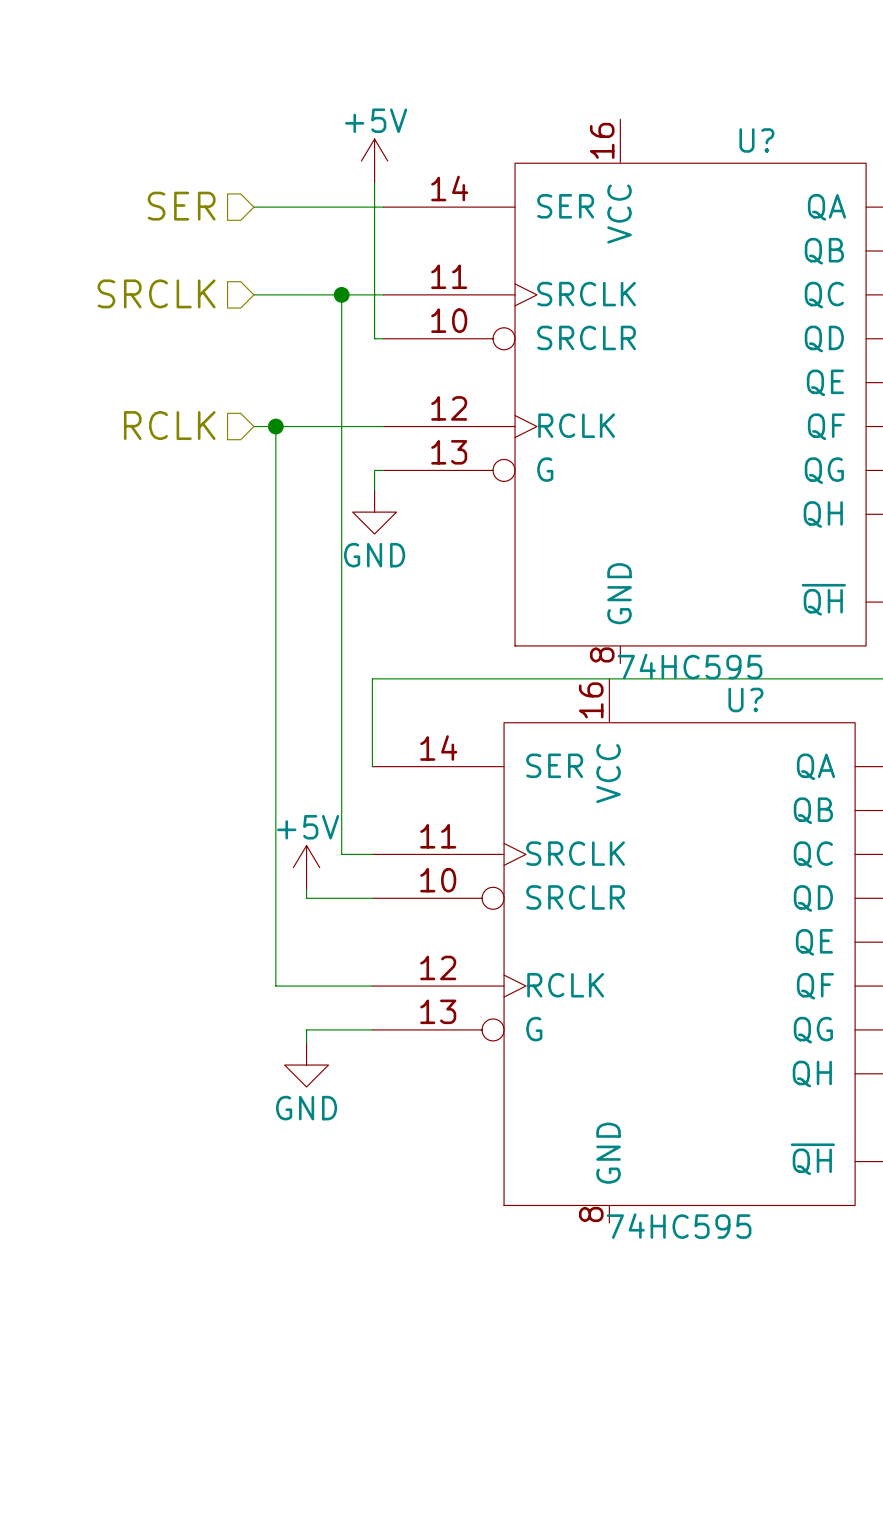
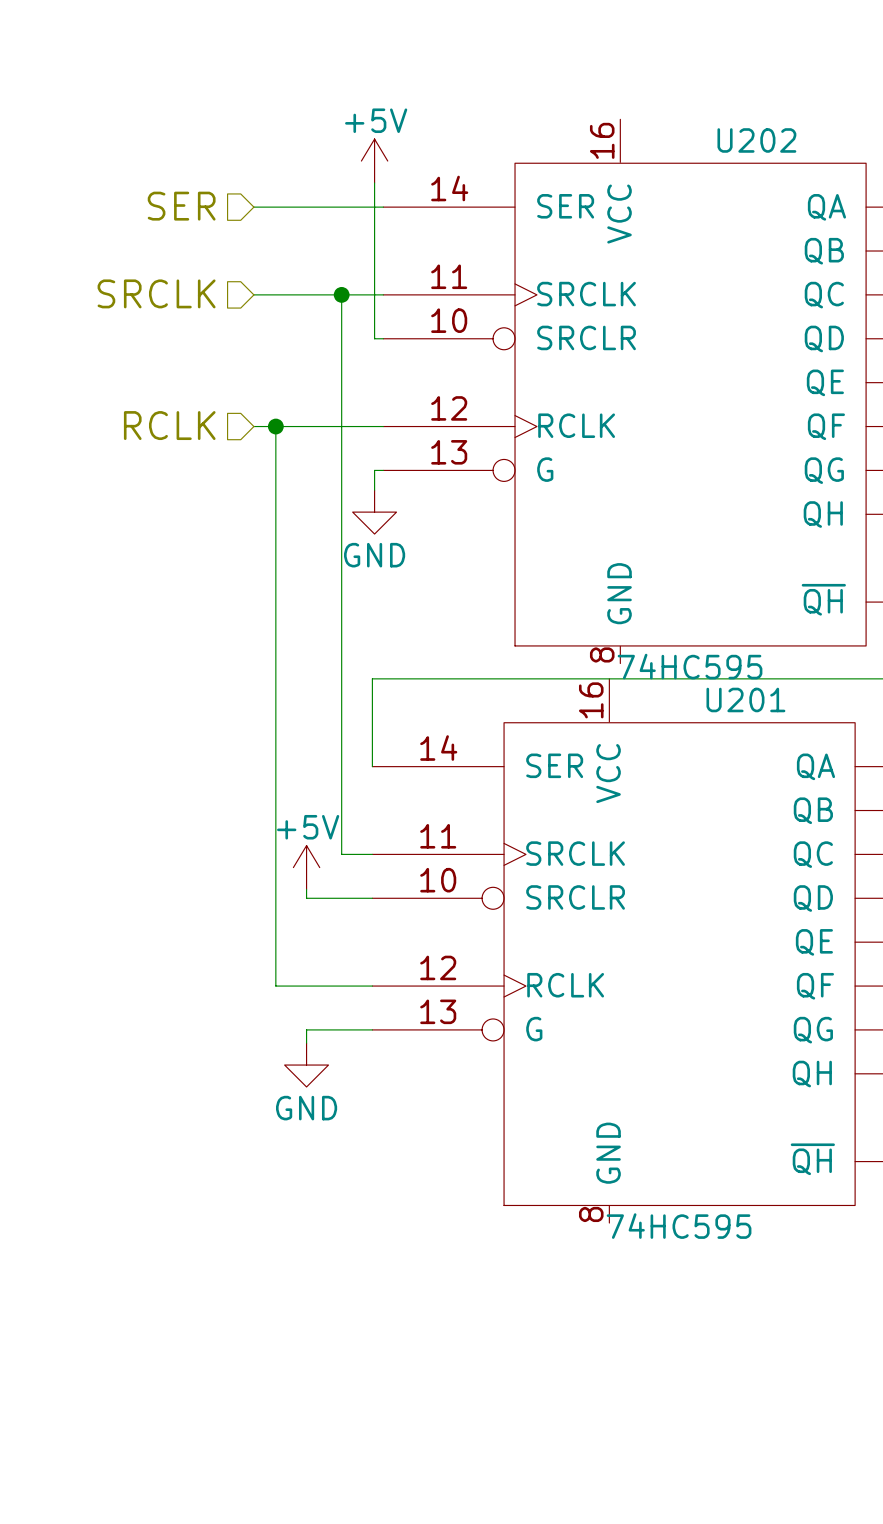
U? name: U? (756, 140) -> U202 (756, 140)
U? name: U? (745, 699) -> U201 (745, 699)

